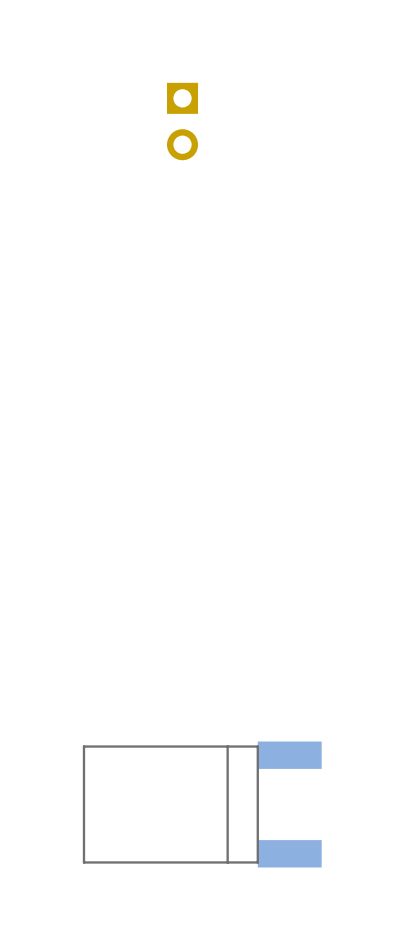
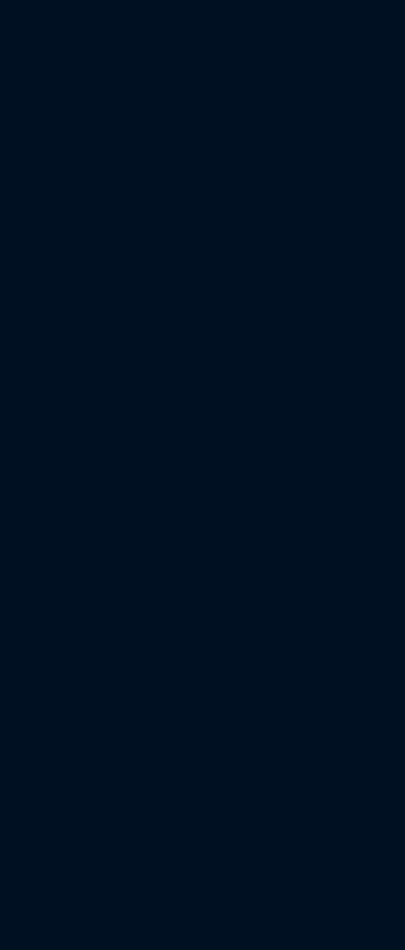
part: (182, 121) -> none
part: (202, 804) -> none

